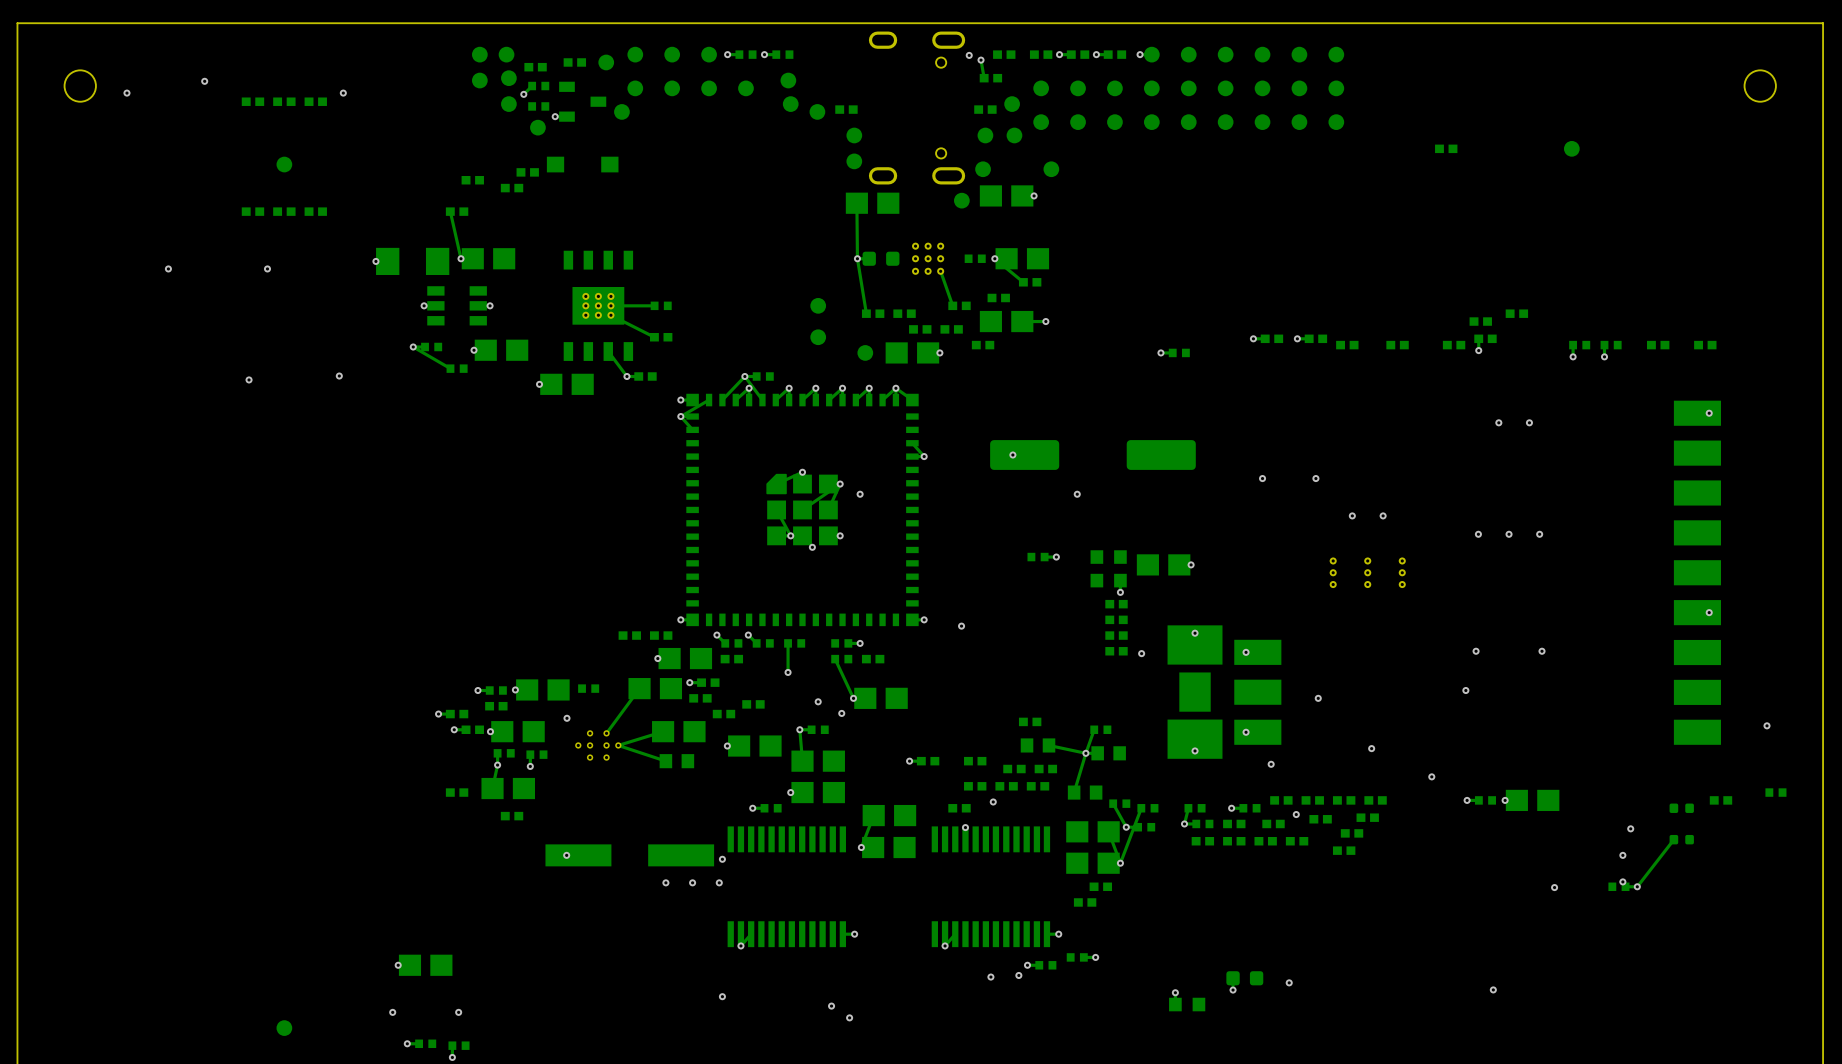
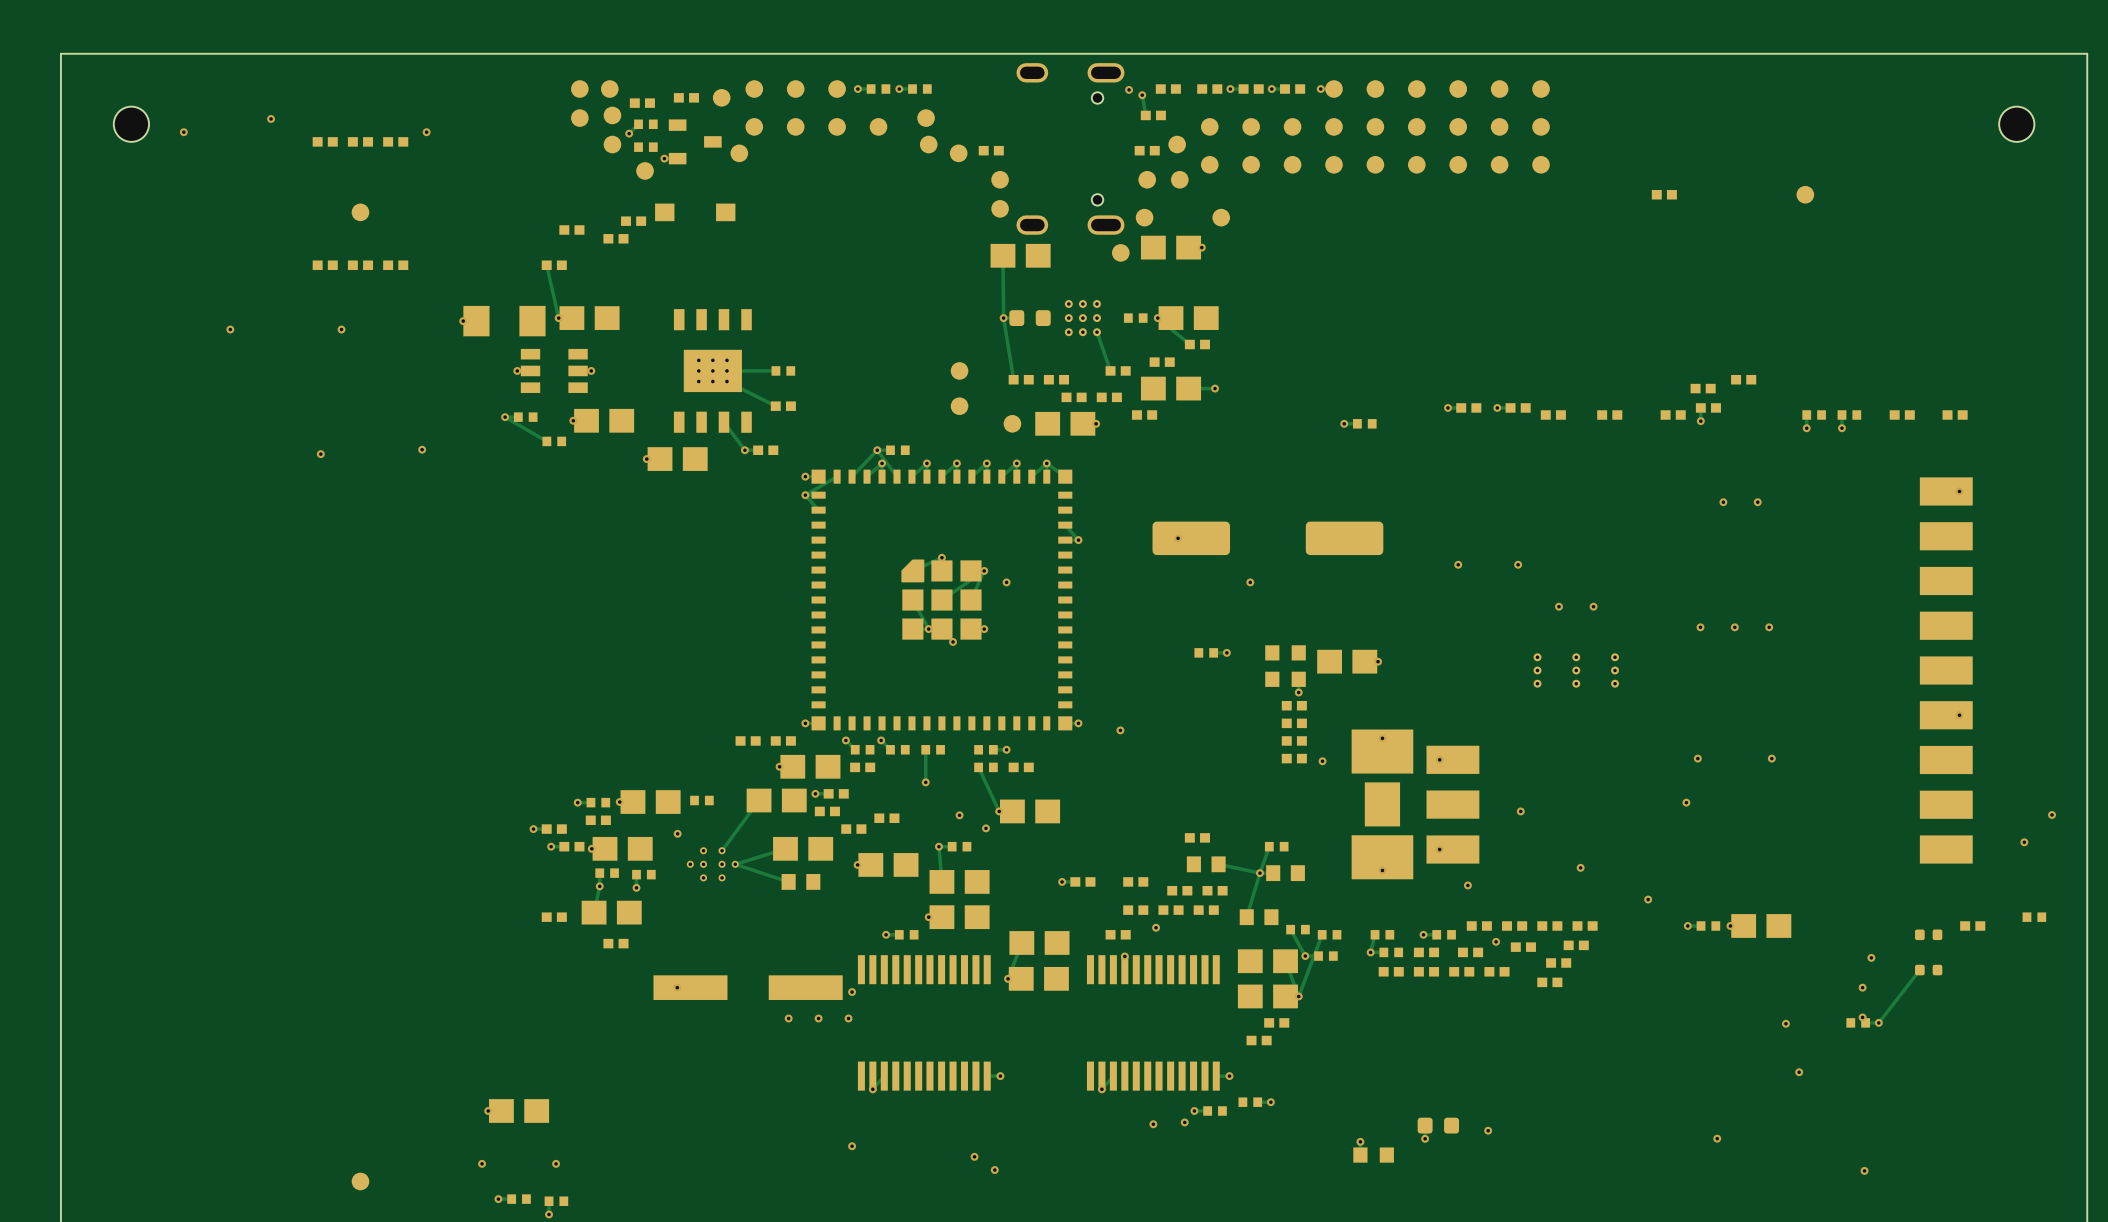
via: none -> (2052, 814)
via: none -> (1799, 1072)
via: none -> (1864, 1170)

